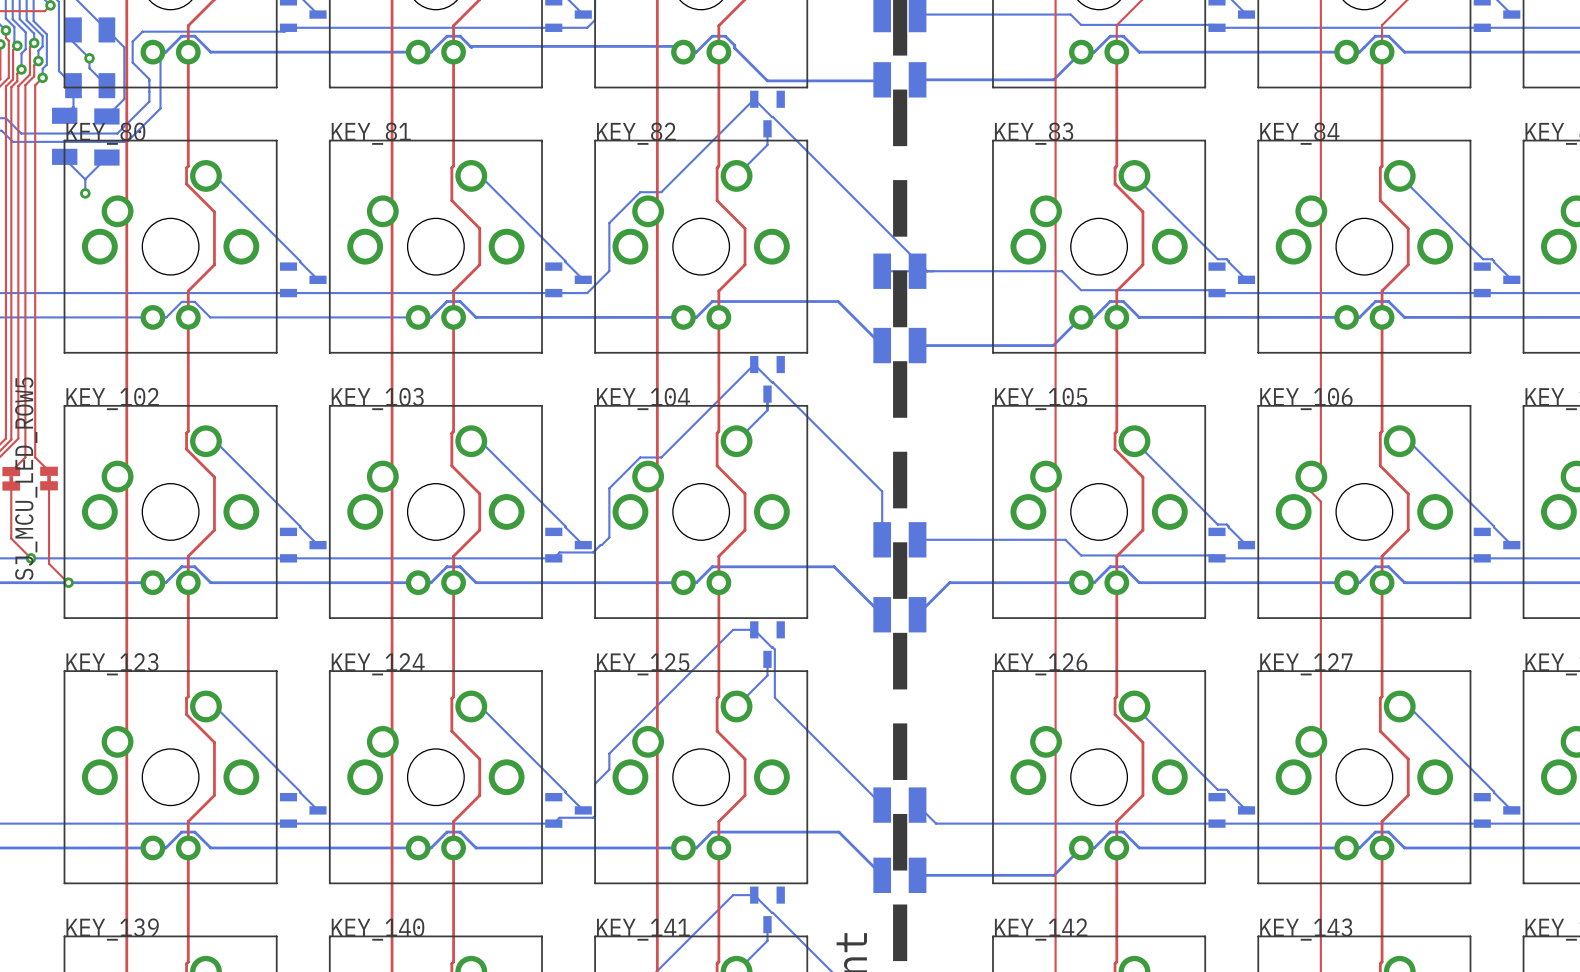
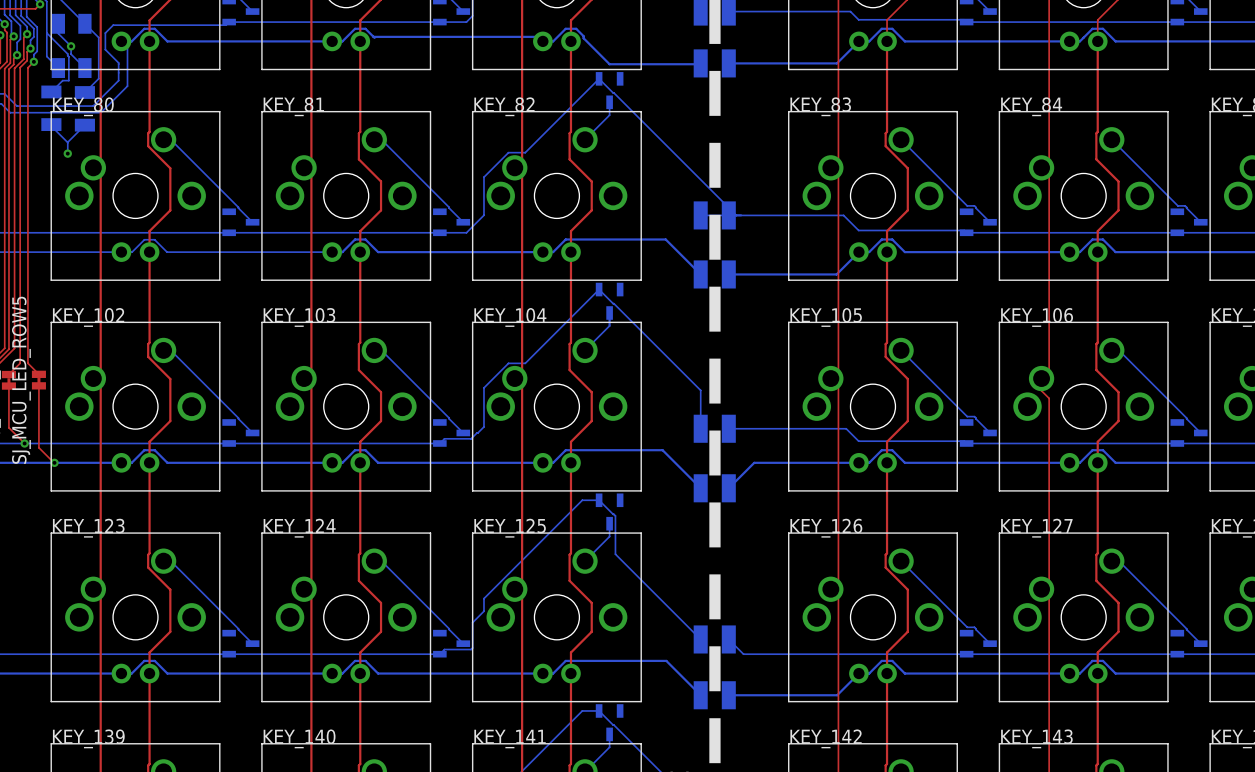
bottom track: (73, 85) (73, 106) -> (46, 33) (68, 56) (68, 80) (62, 80) (58, 84)

